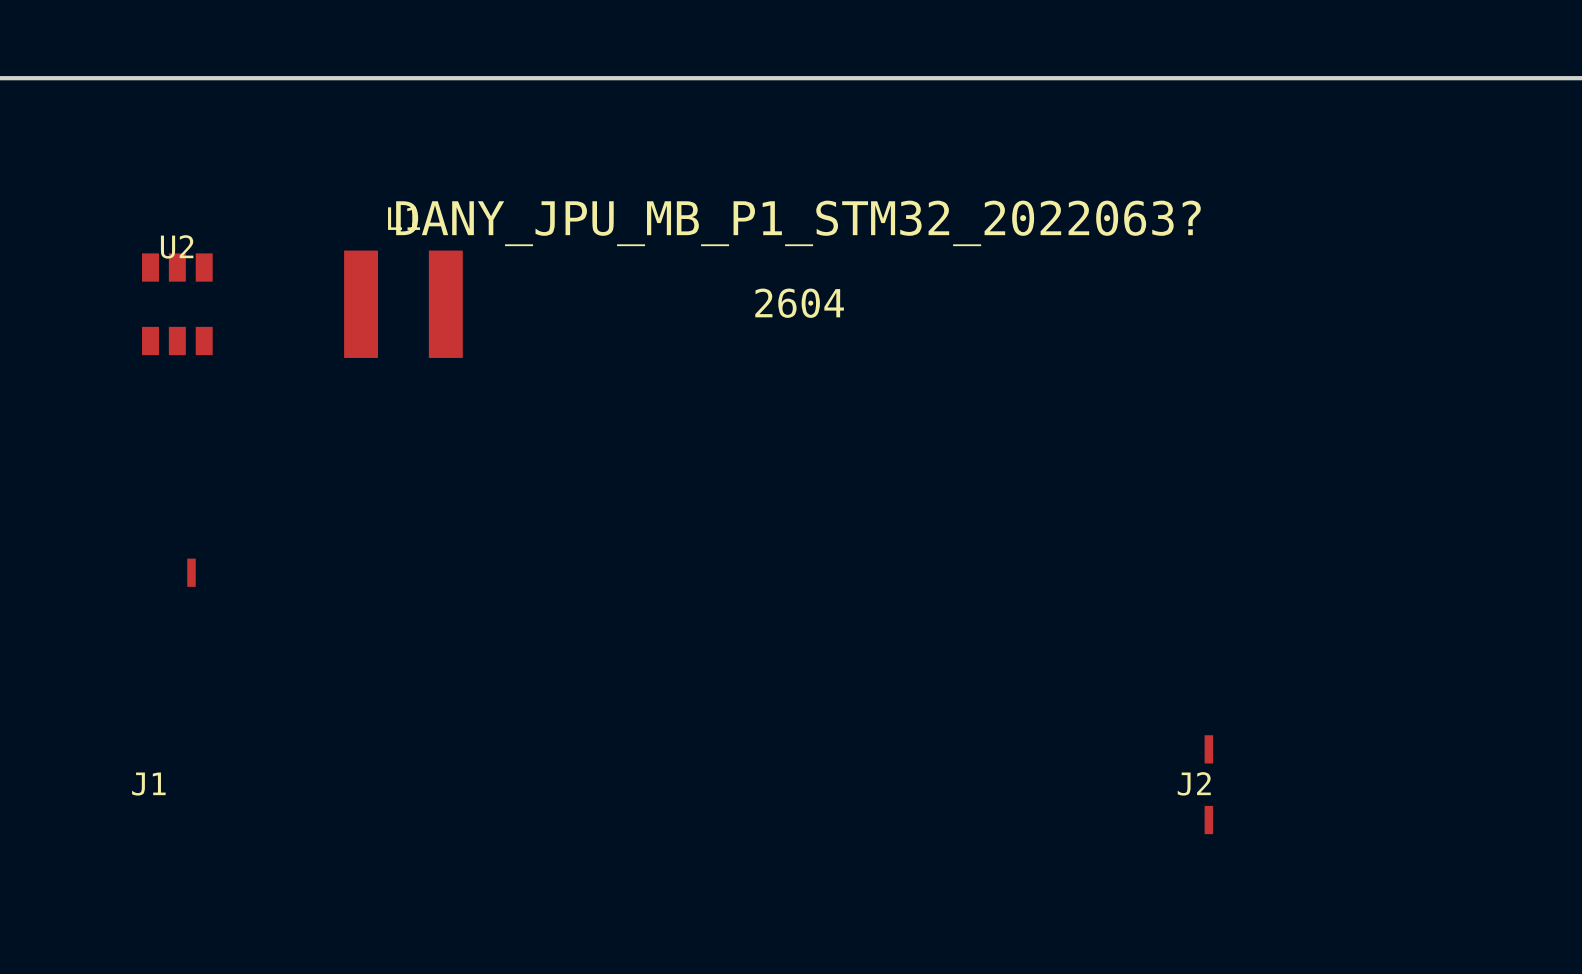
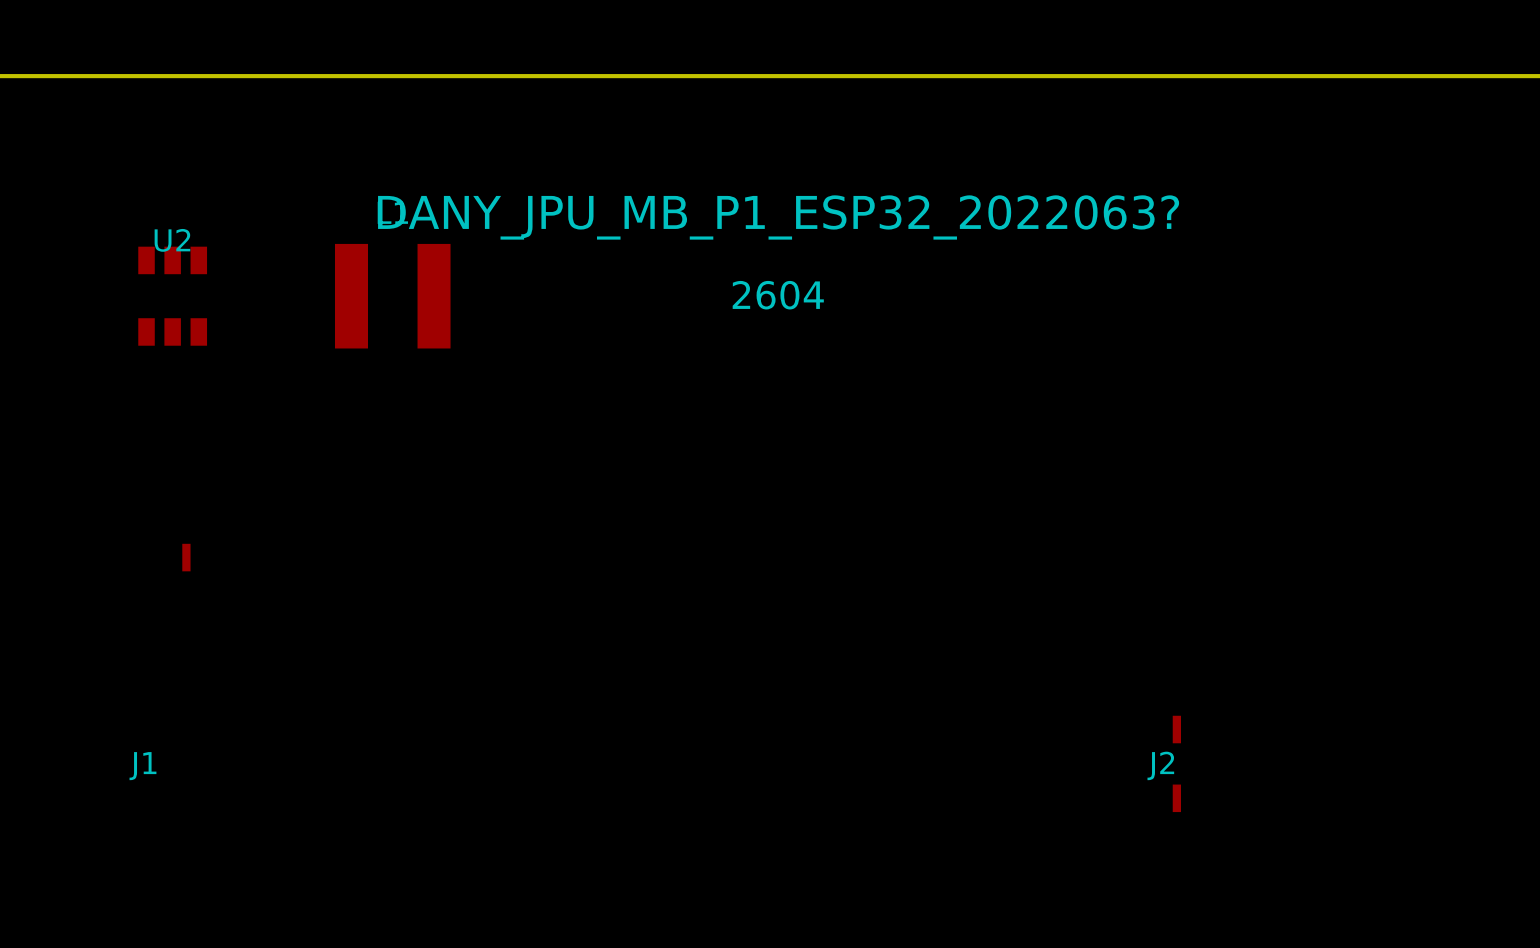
text: DANY_JPU_MB_P1_STM32_2022063? (798, 223) -> DANY_JPU_MB_P1_ESP32_2022063? (778, 217)

